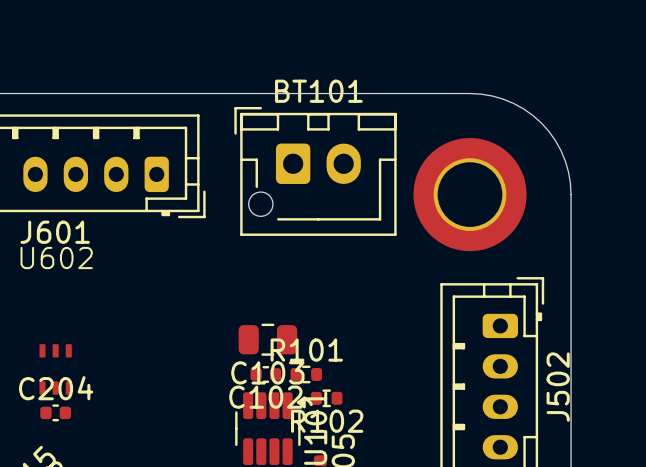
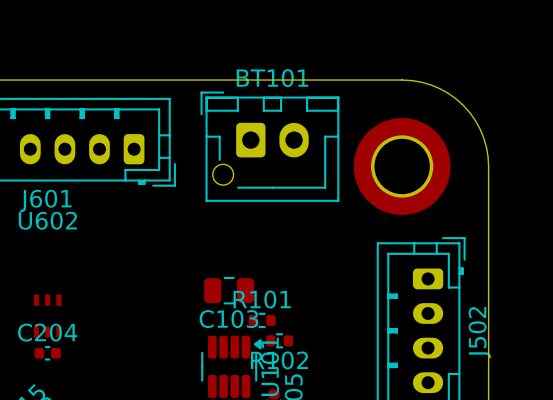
C102: (265, 374) -> none

